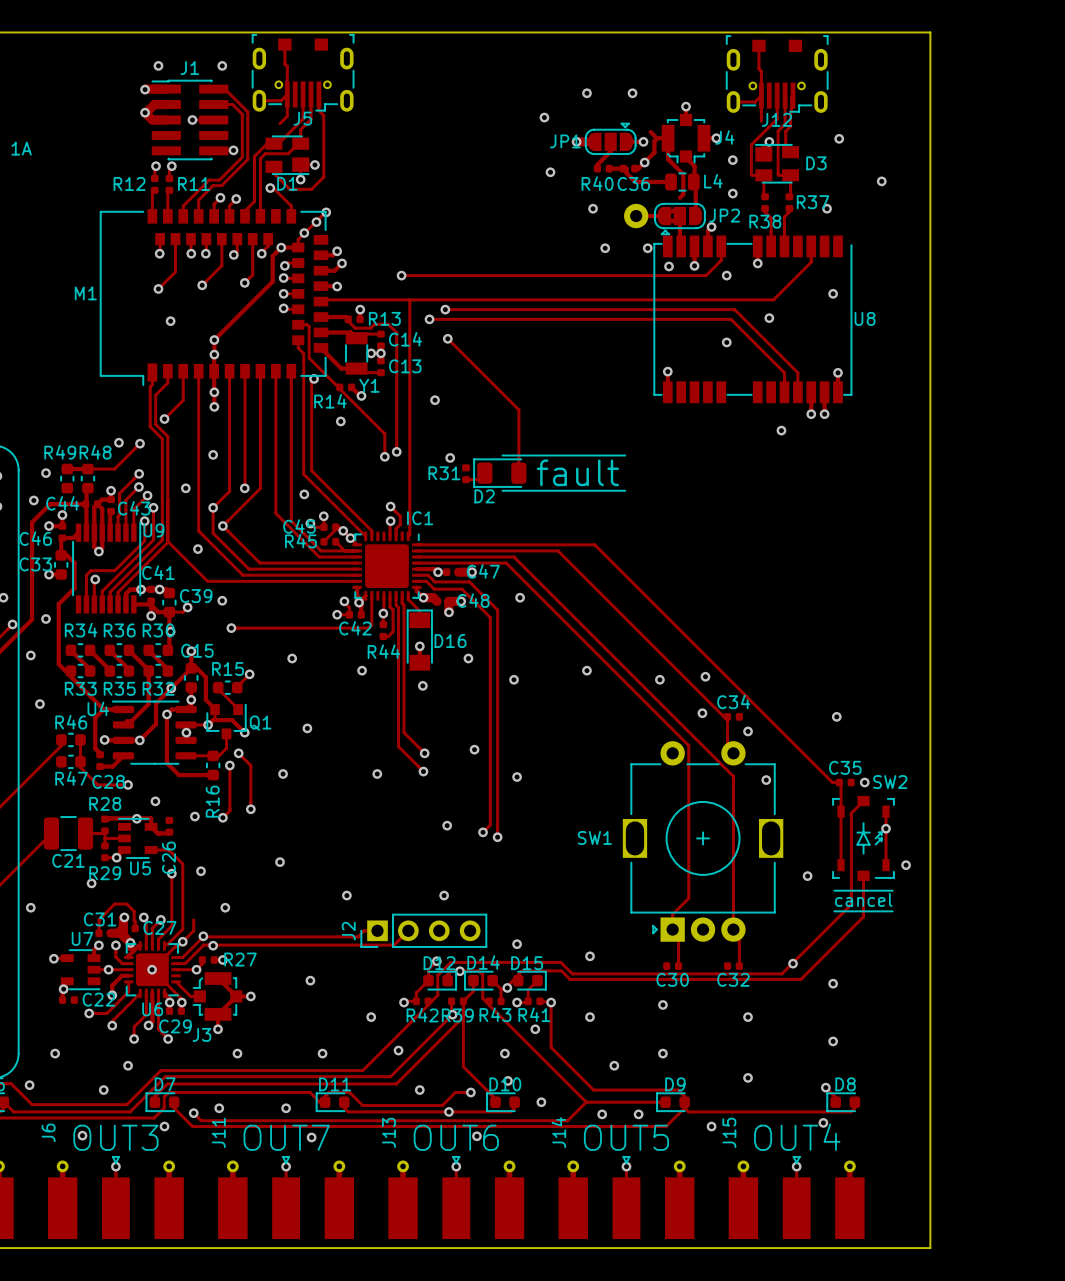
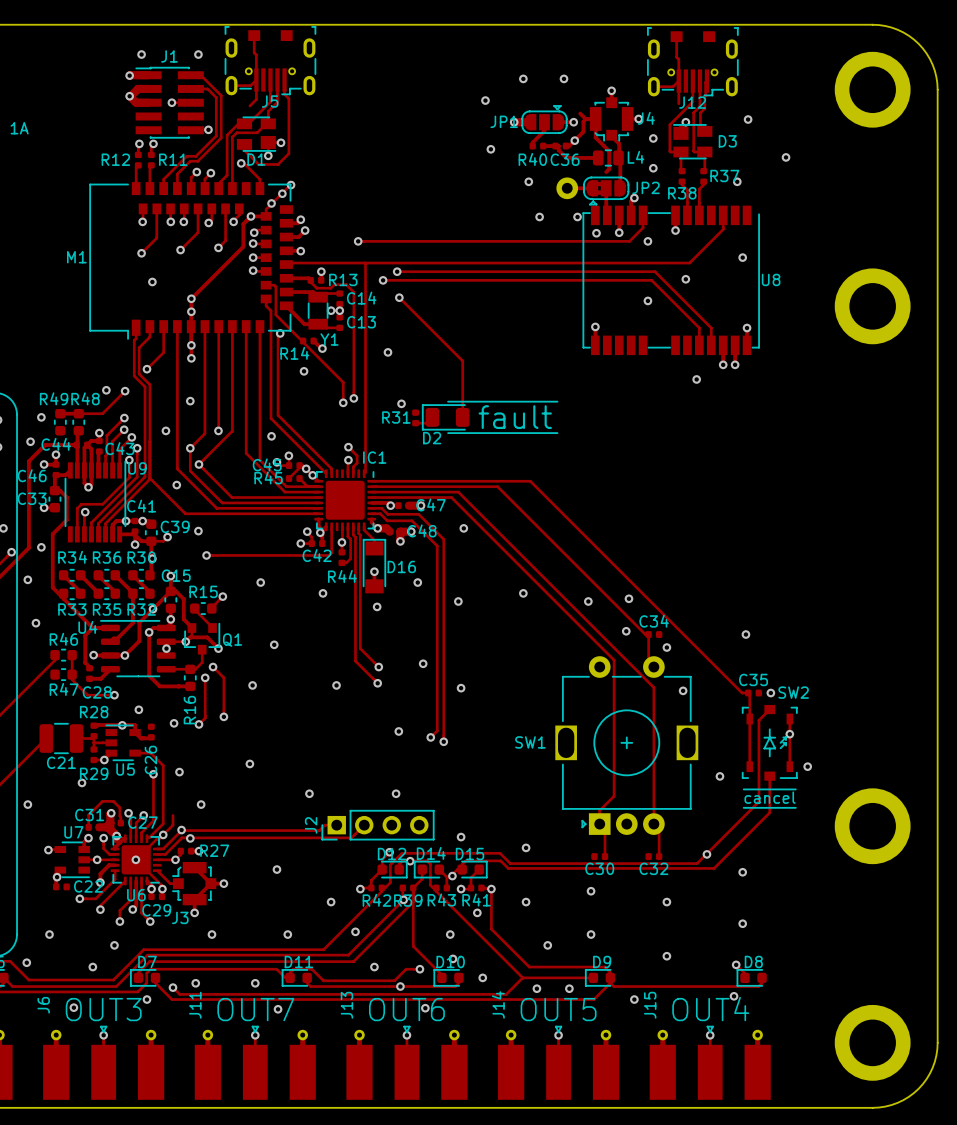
board edge: (930, 32) (930, 1248) -> (829, 24) (879, 25) (897, 29) (908, 35) (922, 48) (929, 59) (936, 77) (937, 89) (937, 1049) (932, 1067) (926, 1078) (913, 1093) (903, 1100) (879, 1107) (829, 1107)
part: none -> (872, 89)
part: none -> (872, 306)
part: none -> (872, 826)
part: none -> (872, 1042)

